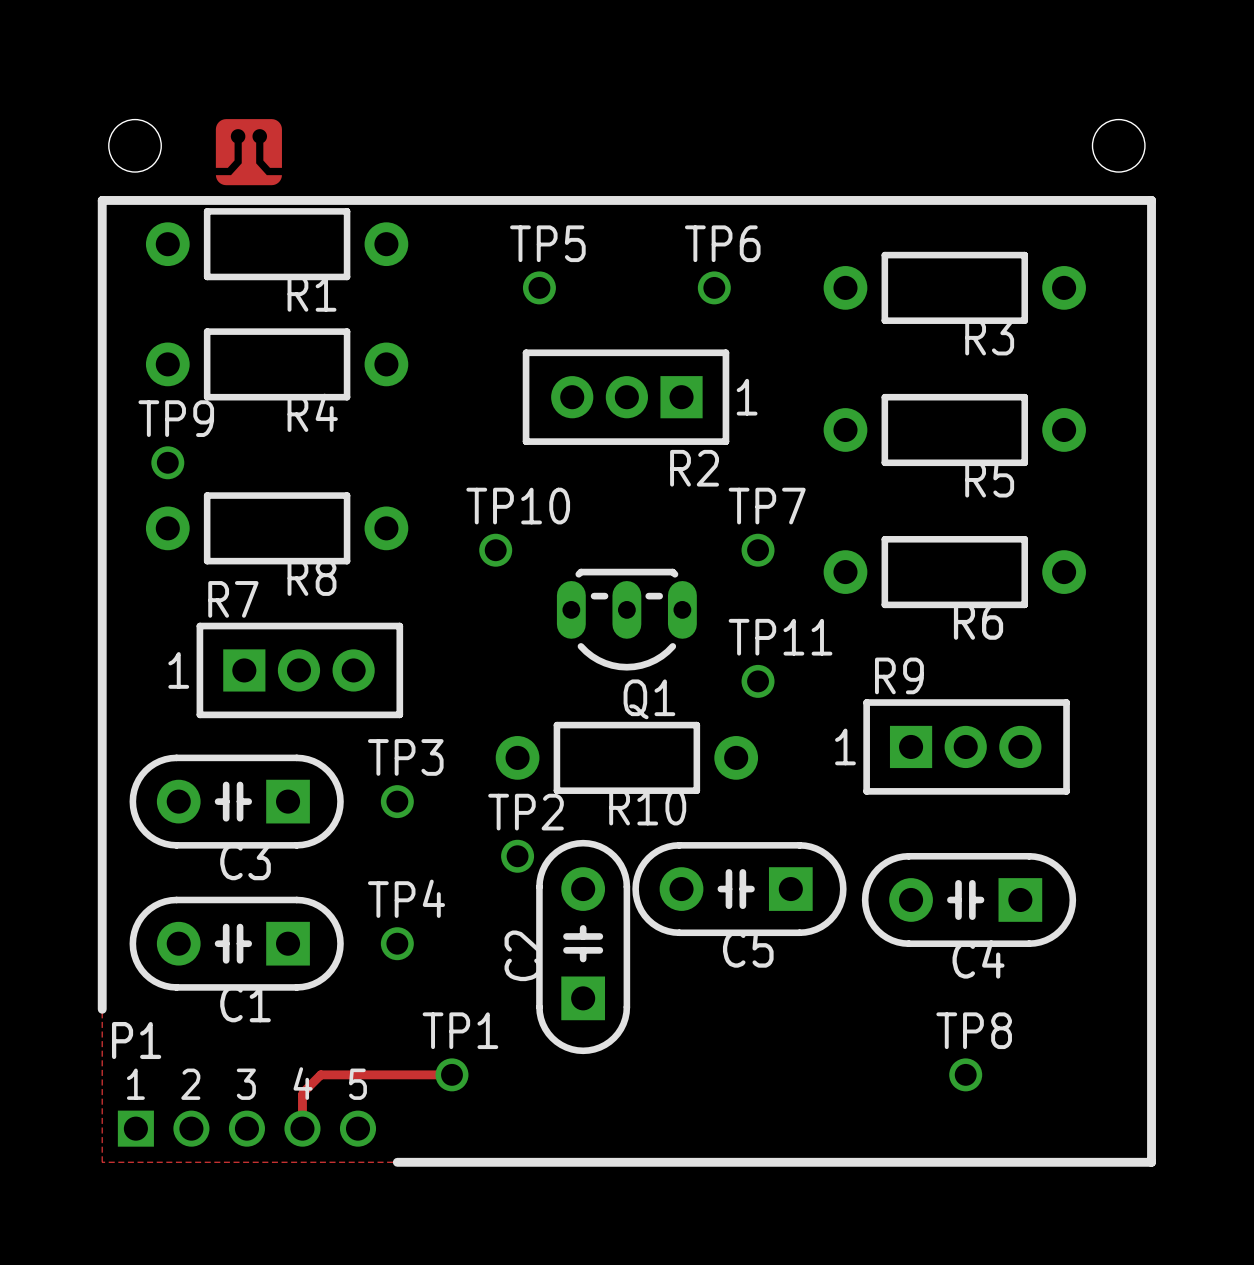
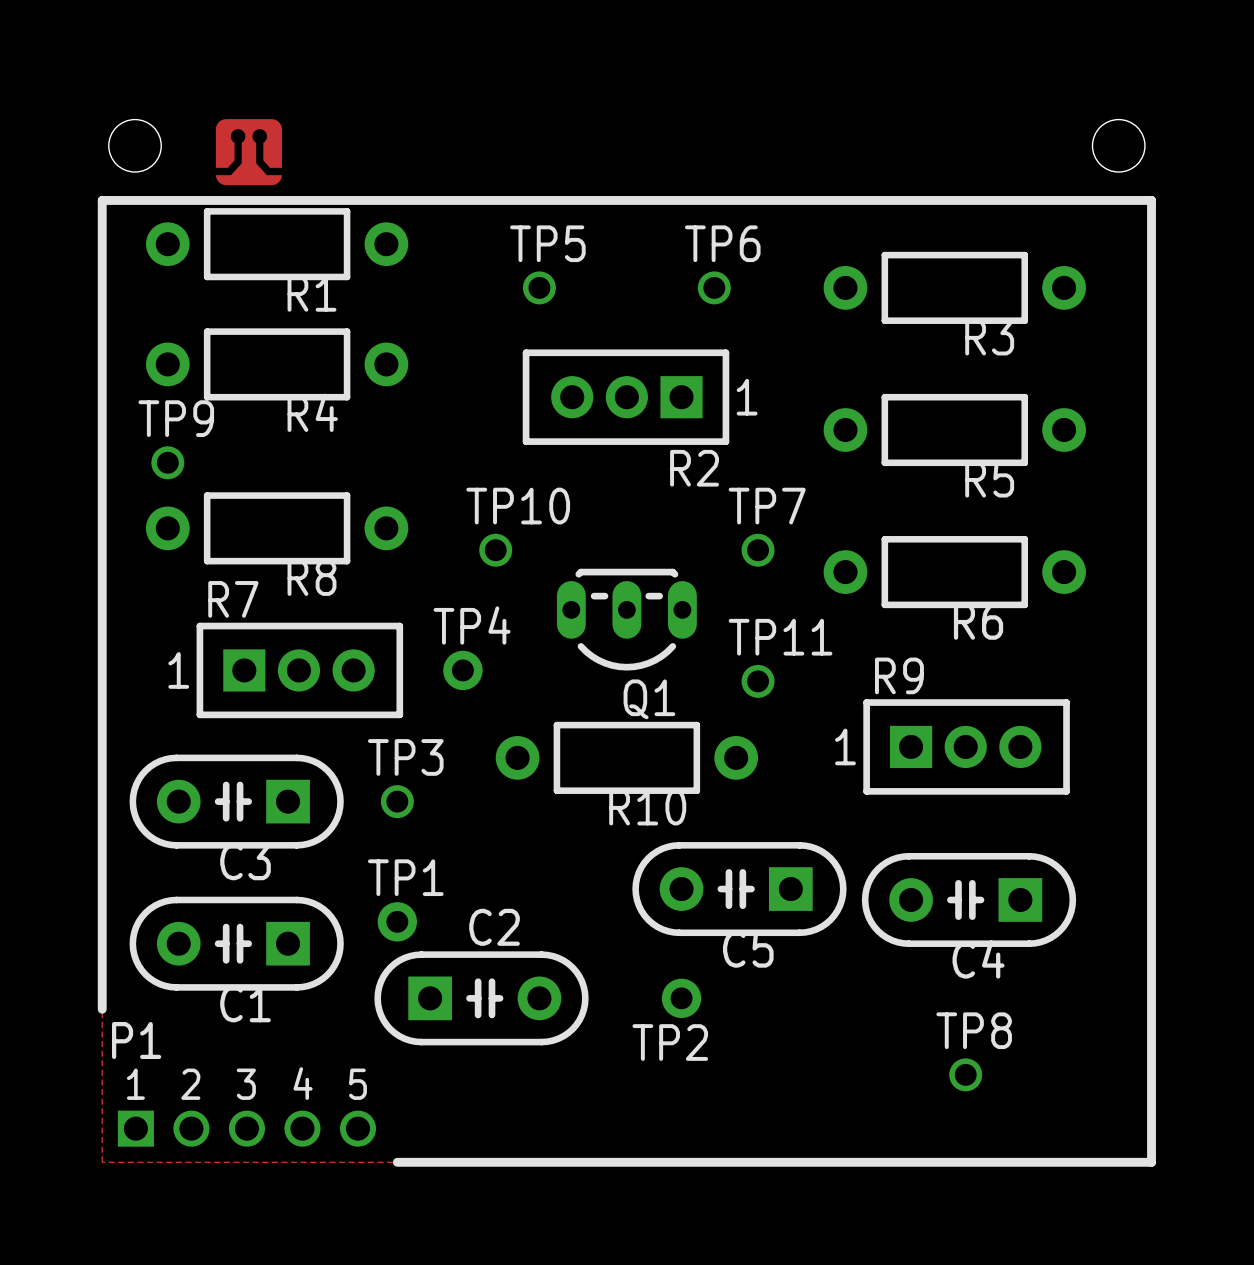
TP2 name position: TP2 (526, 812) -> TP2 (670, 1042)
TP2 footprint: [501, 839, 535, 873] -> [661, 978, 702, 1019]
TP4 footprint: [380, 927, 414, 961] -> [443, 650, 483, 691]
C2 rotation: 0° (583, 946) -> 90° clockwise (481, 998)
TP1 footprint: [435, 1058, 469, 1092] -> [377, 902, 418, 942]
track: (451, 1074) (320, 1074) (302, 1093) (302, 1128) -> none

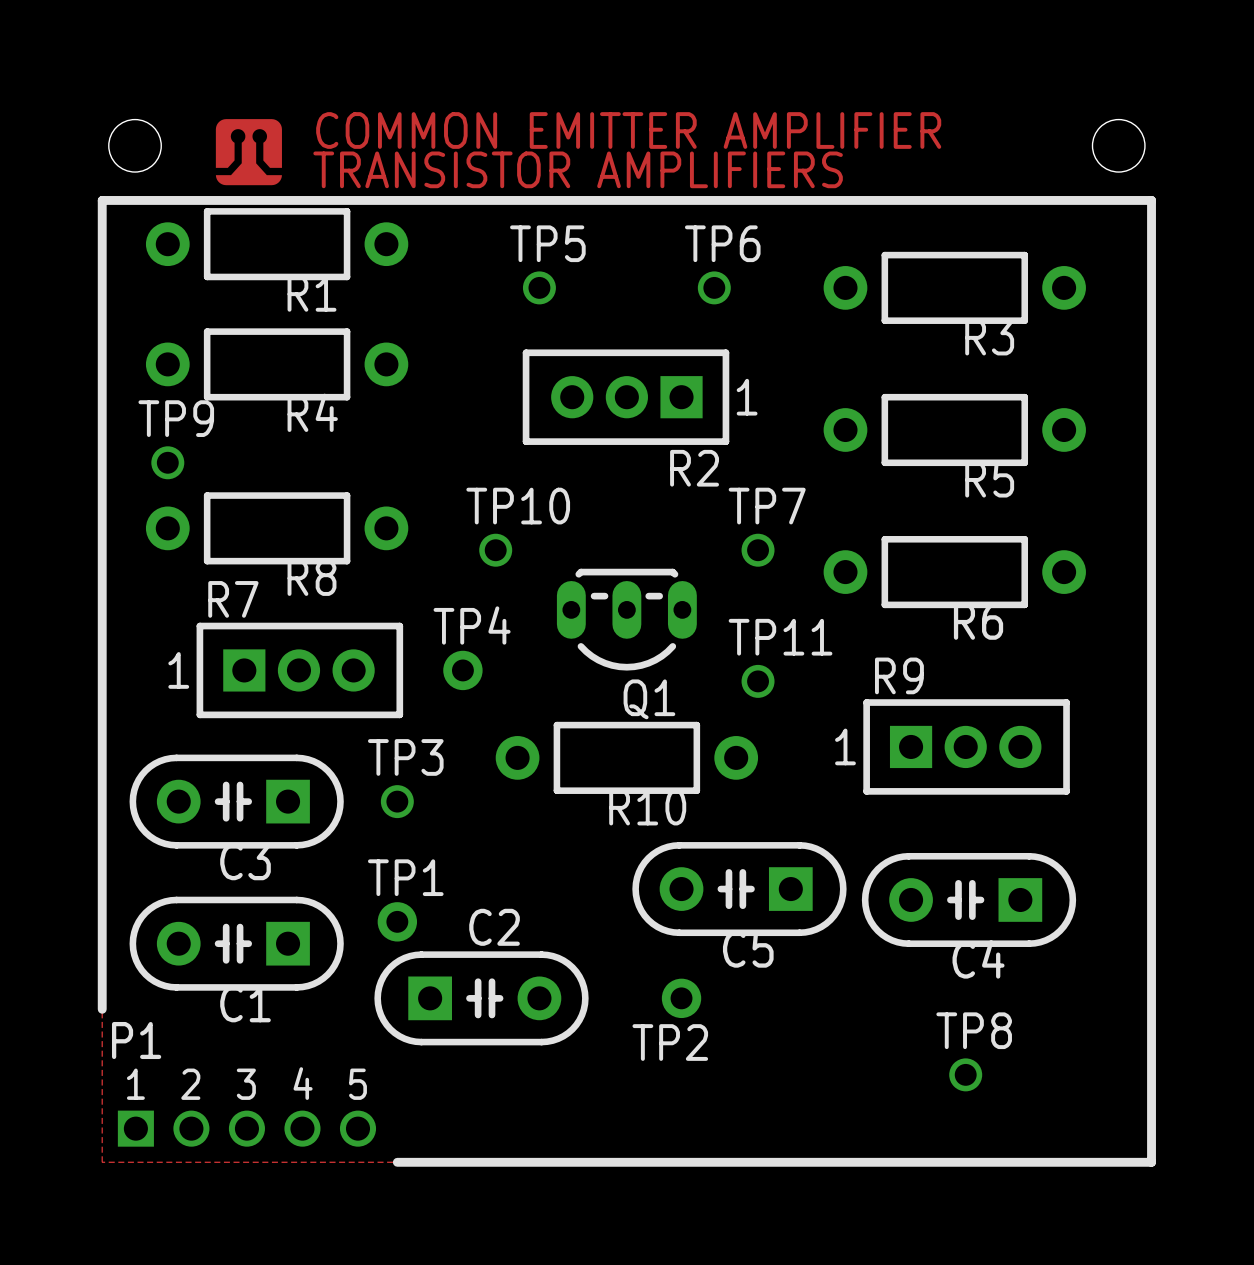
part text: none -> COMMON EMITTER AMPLIFIER (628, 130)
part text: none -> TRANSISTOR AMPLIFIERS (578, 169)

